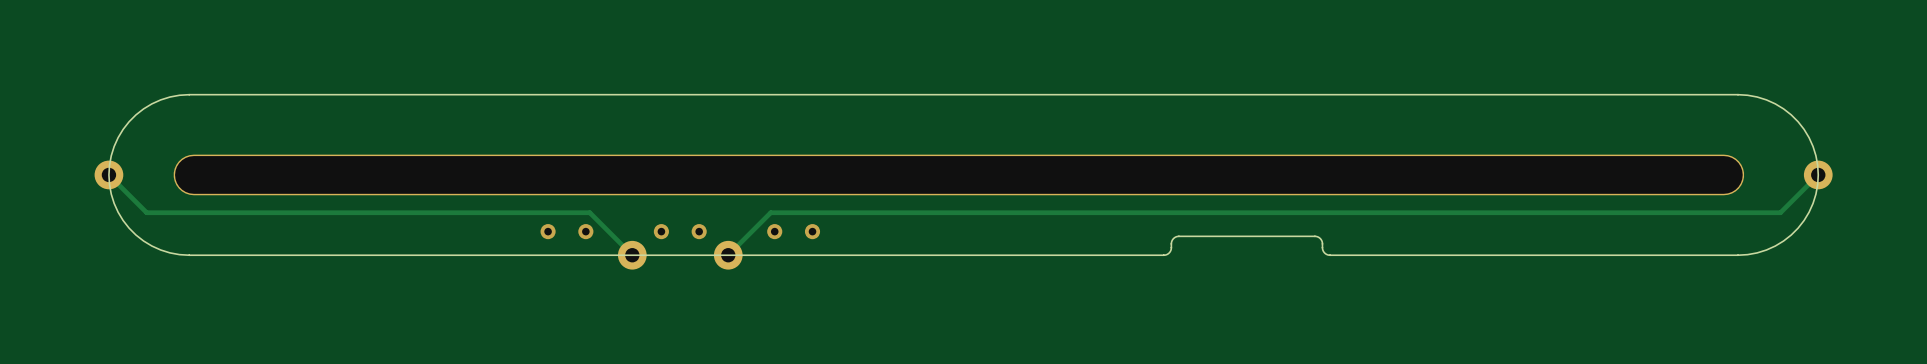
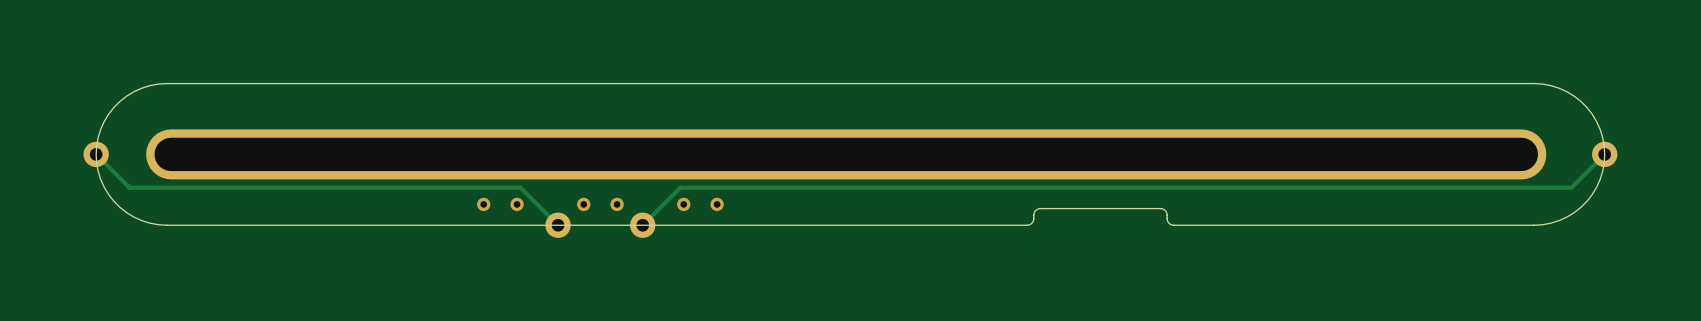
part footprint: [173, 154, 1745, 196] -> [146, 129, 1547, 180]

